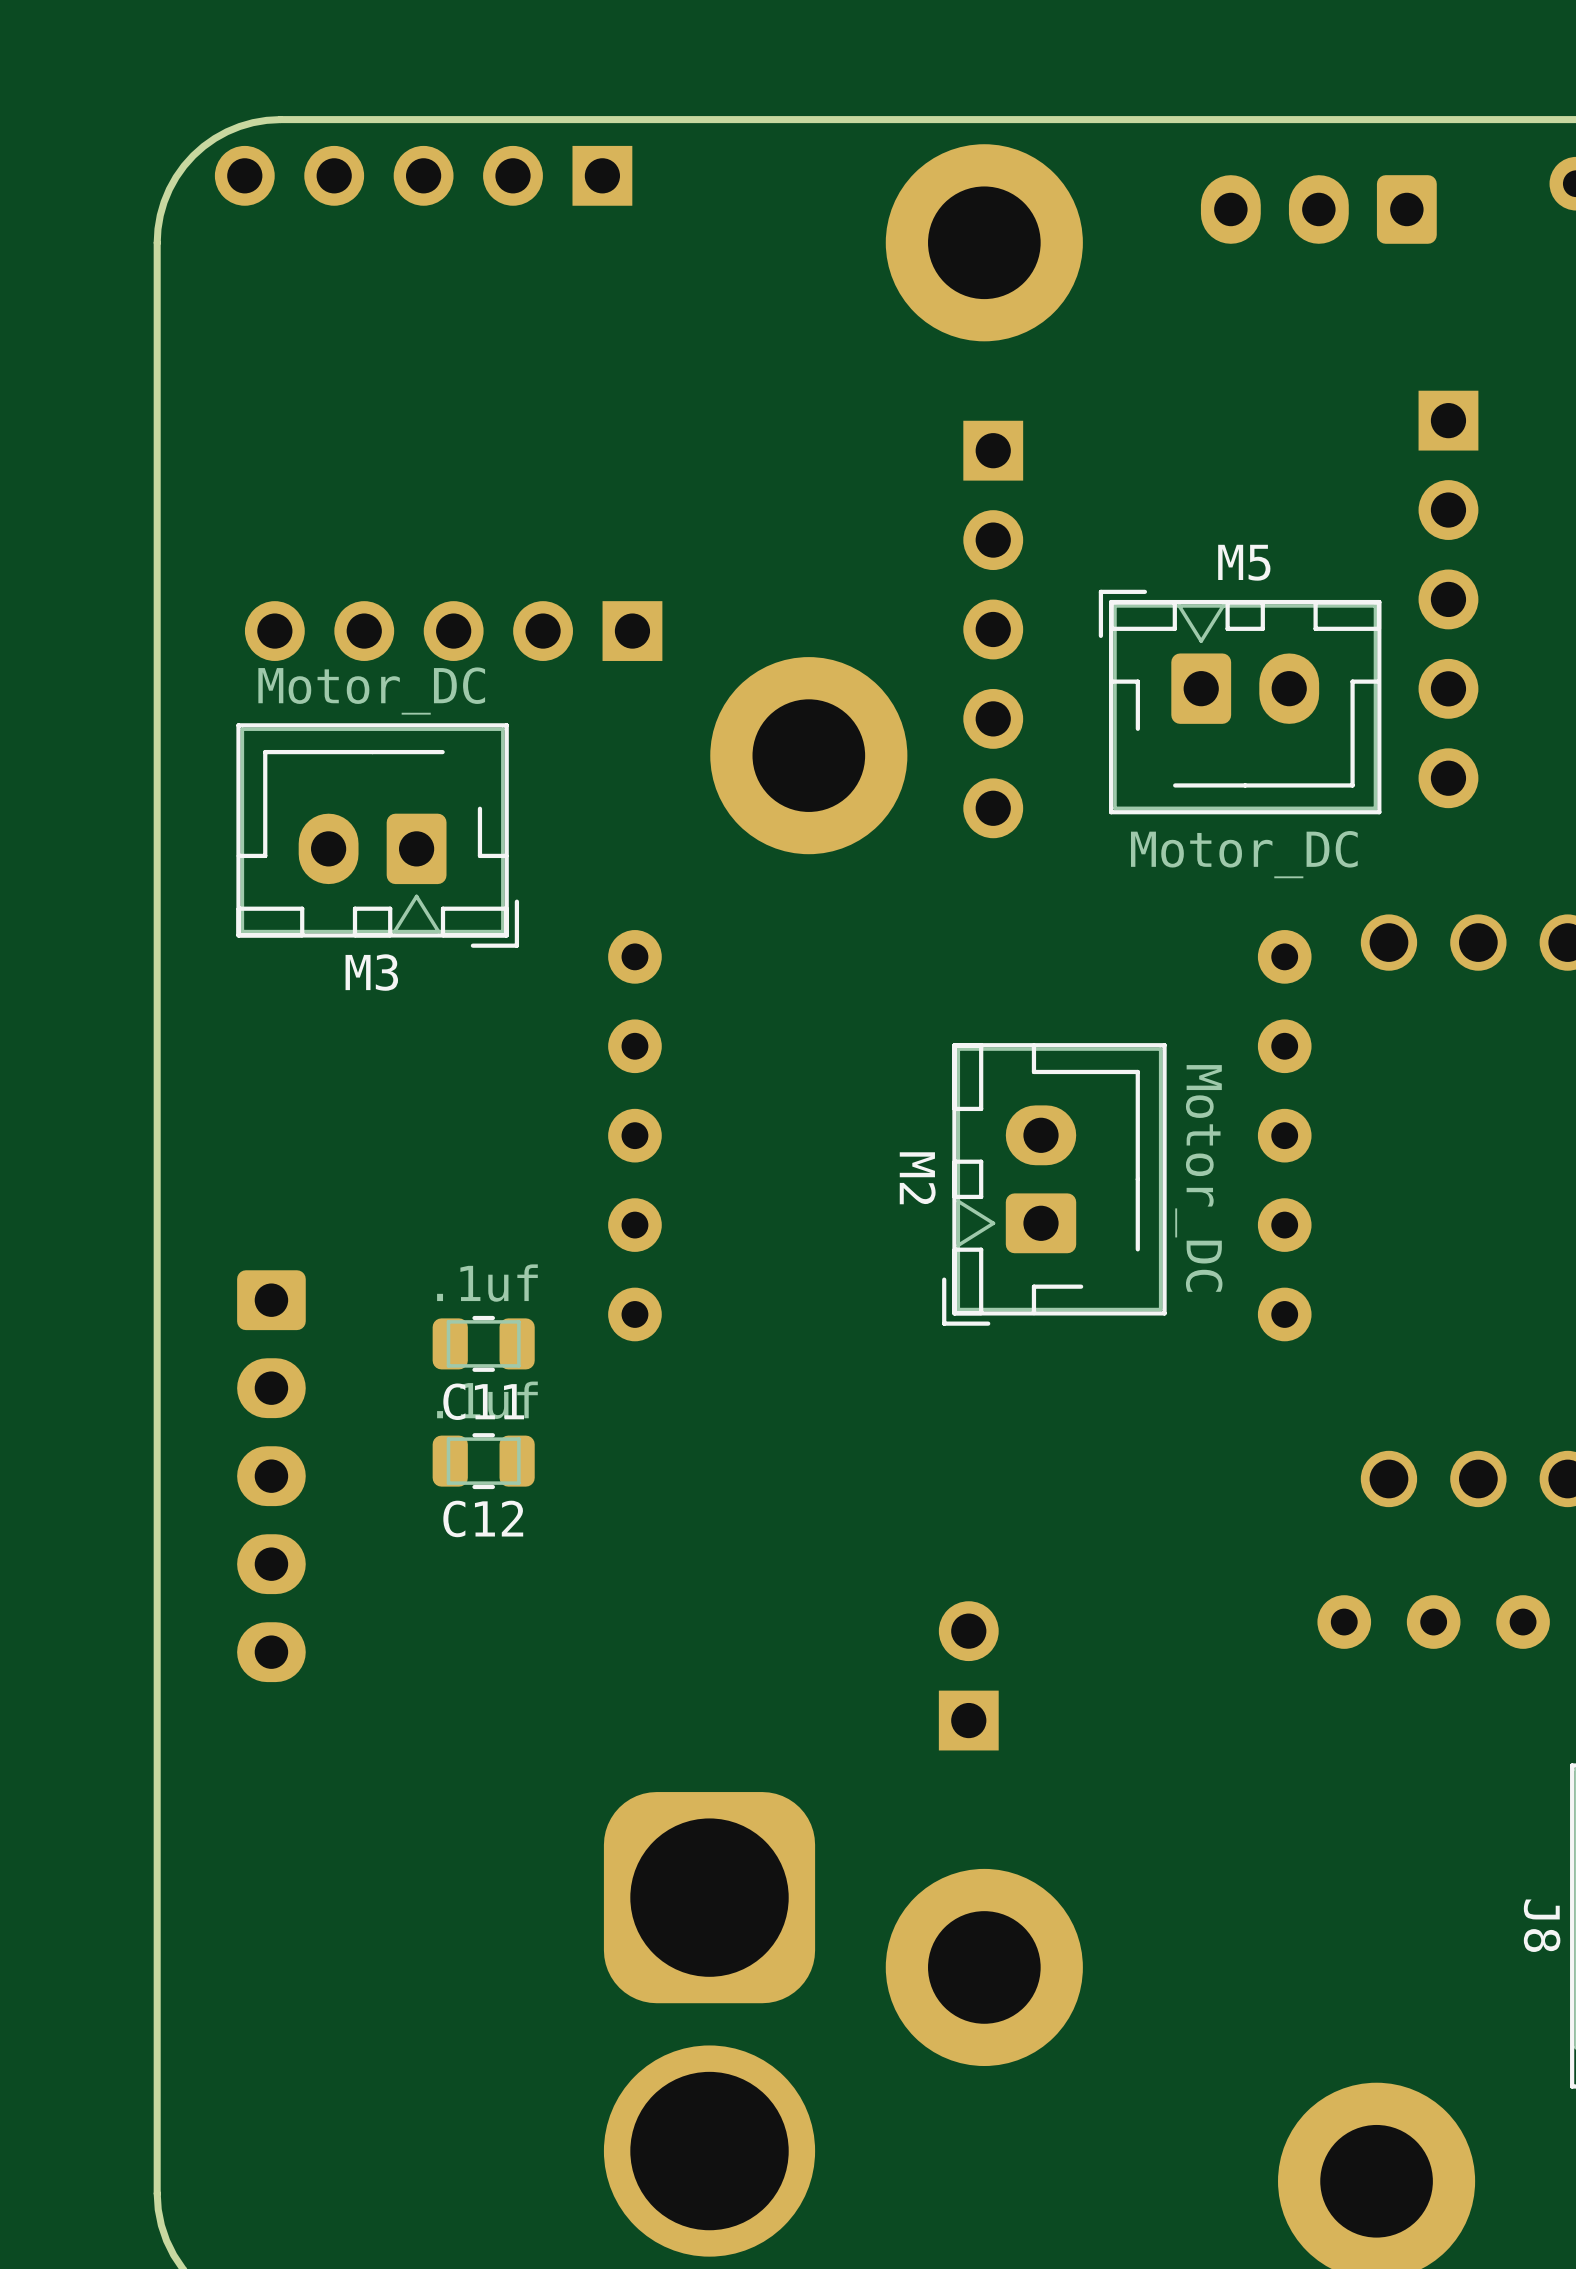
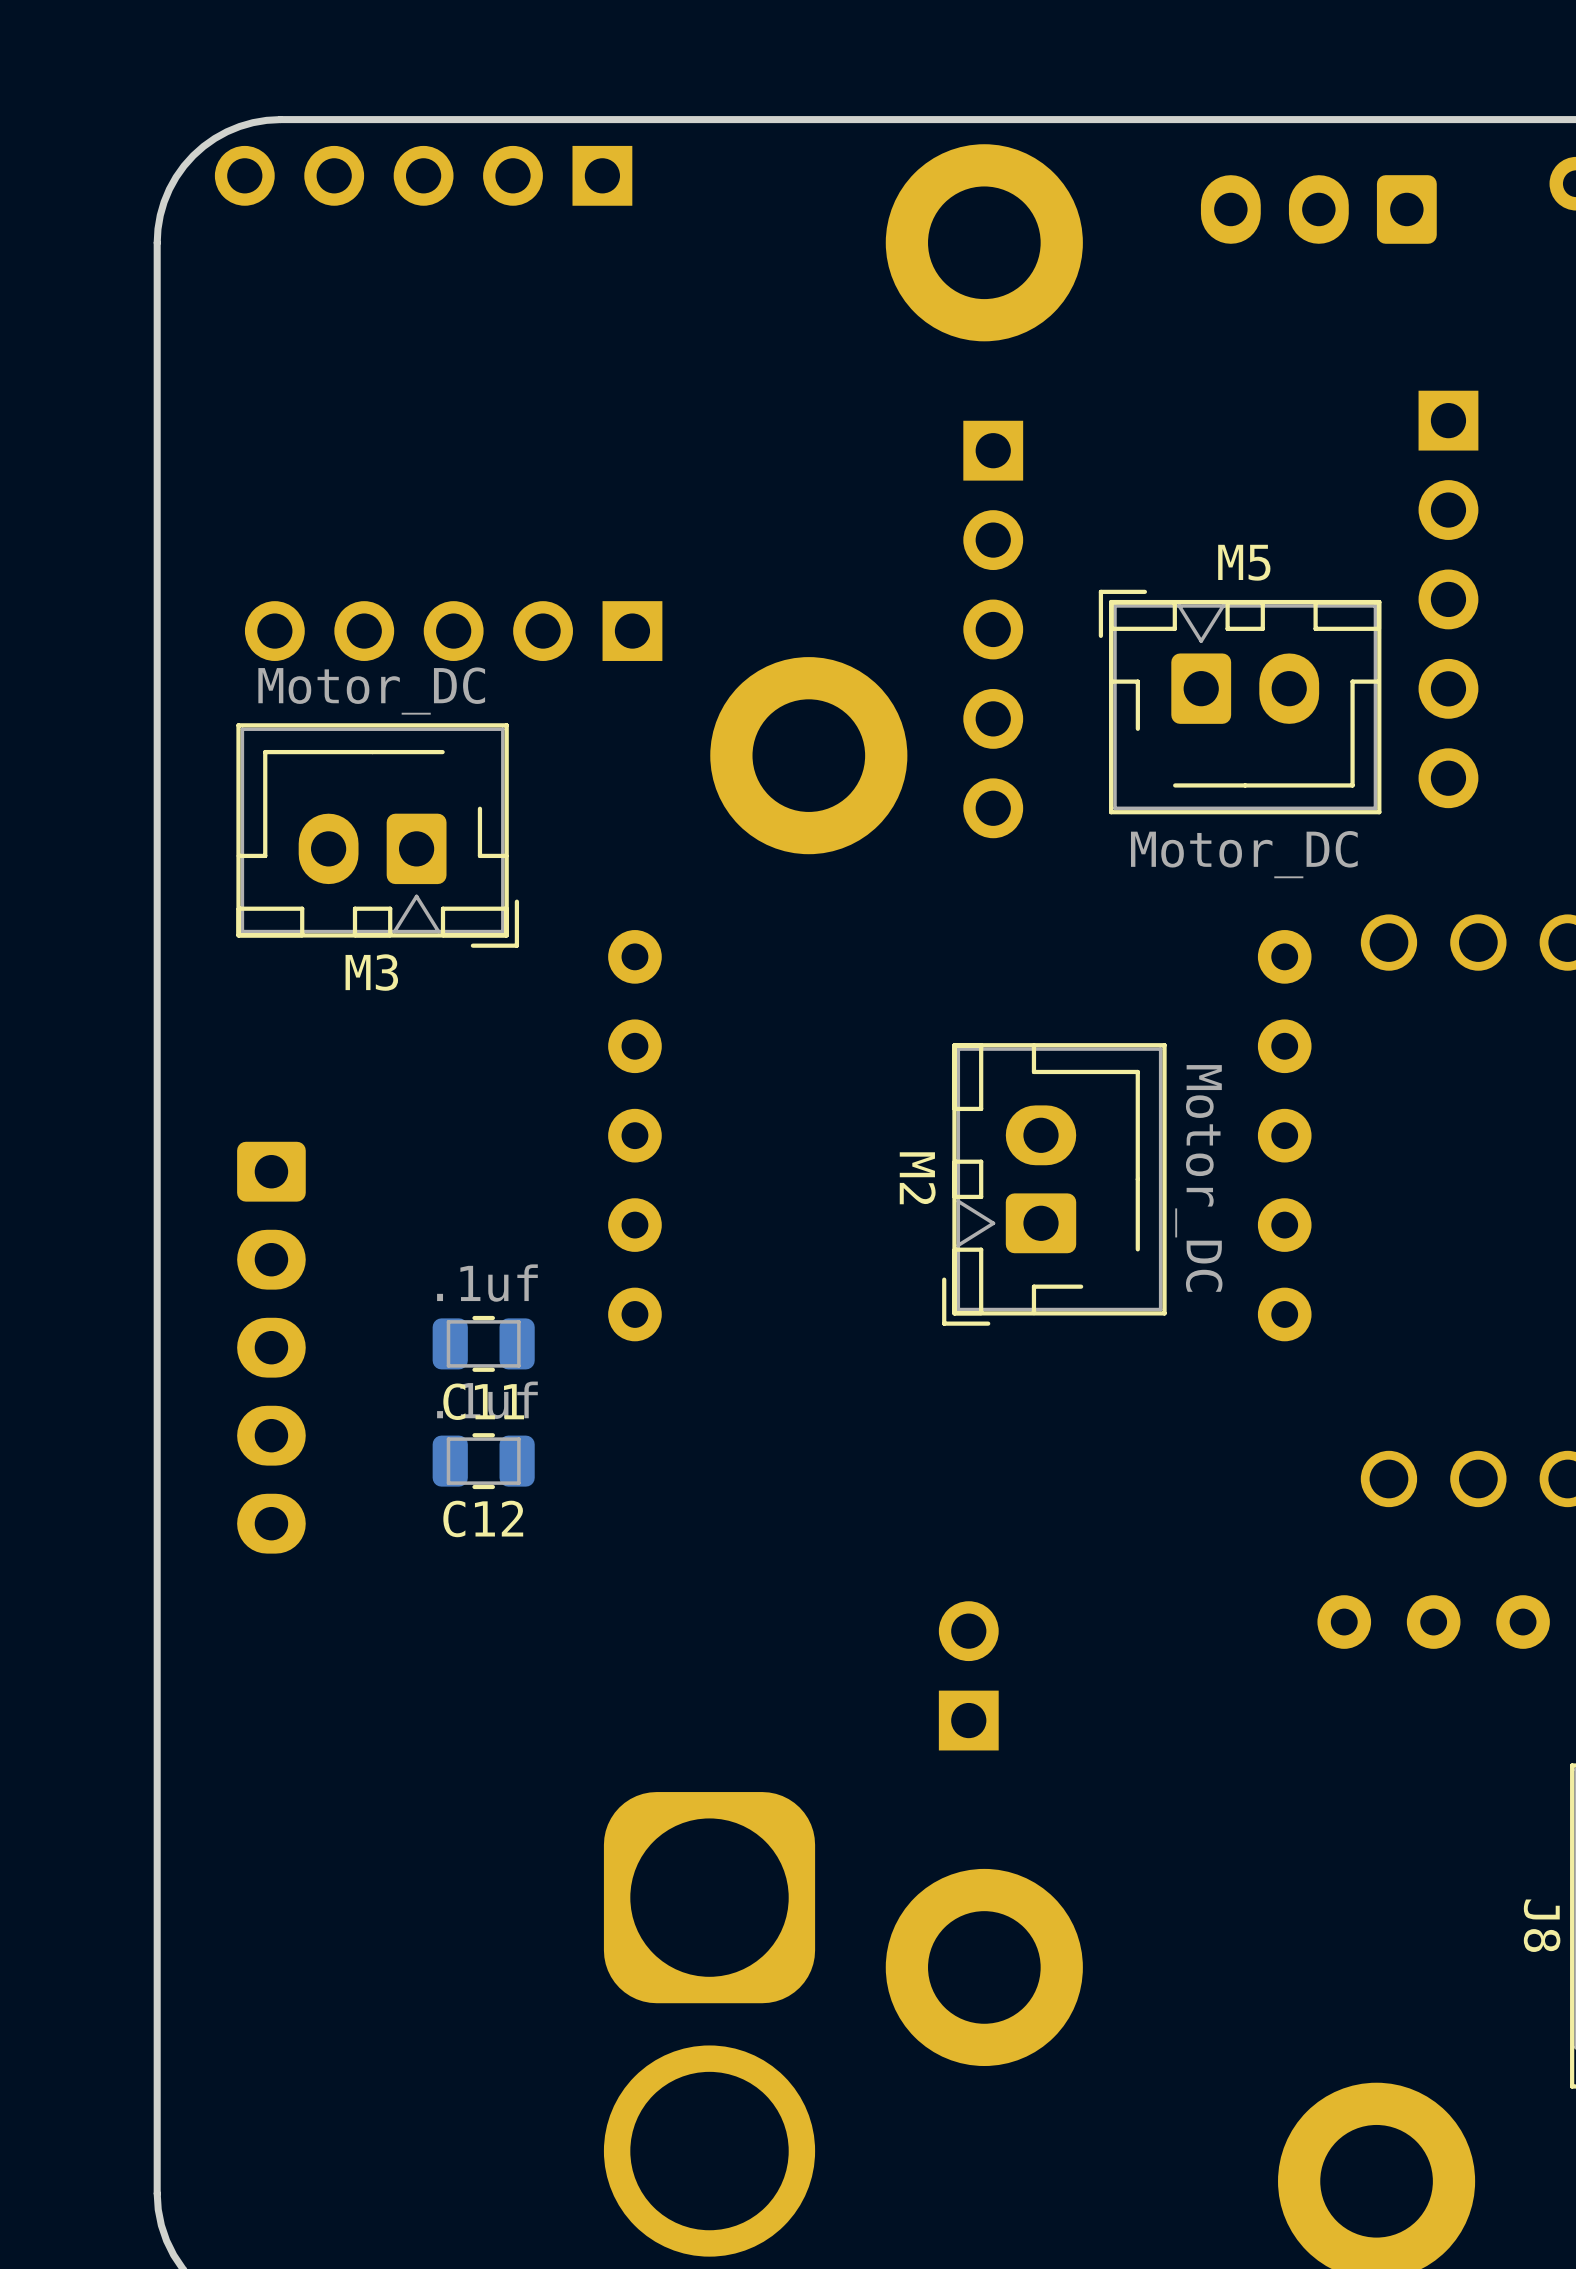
part position: (271, 1476) -> (271, 1347)

